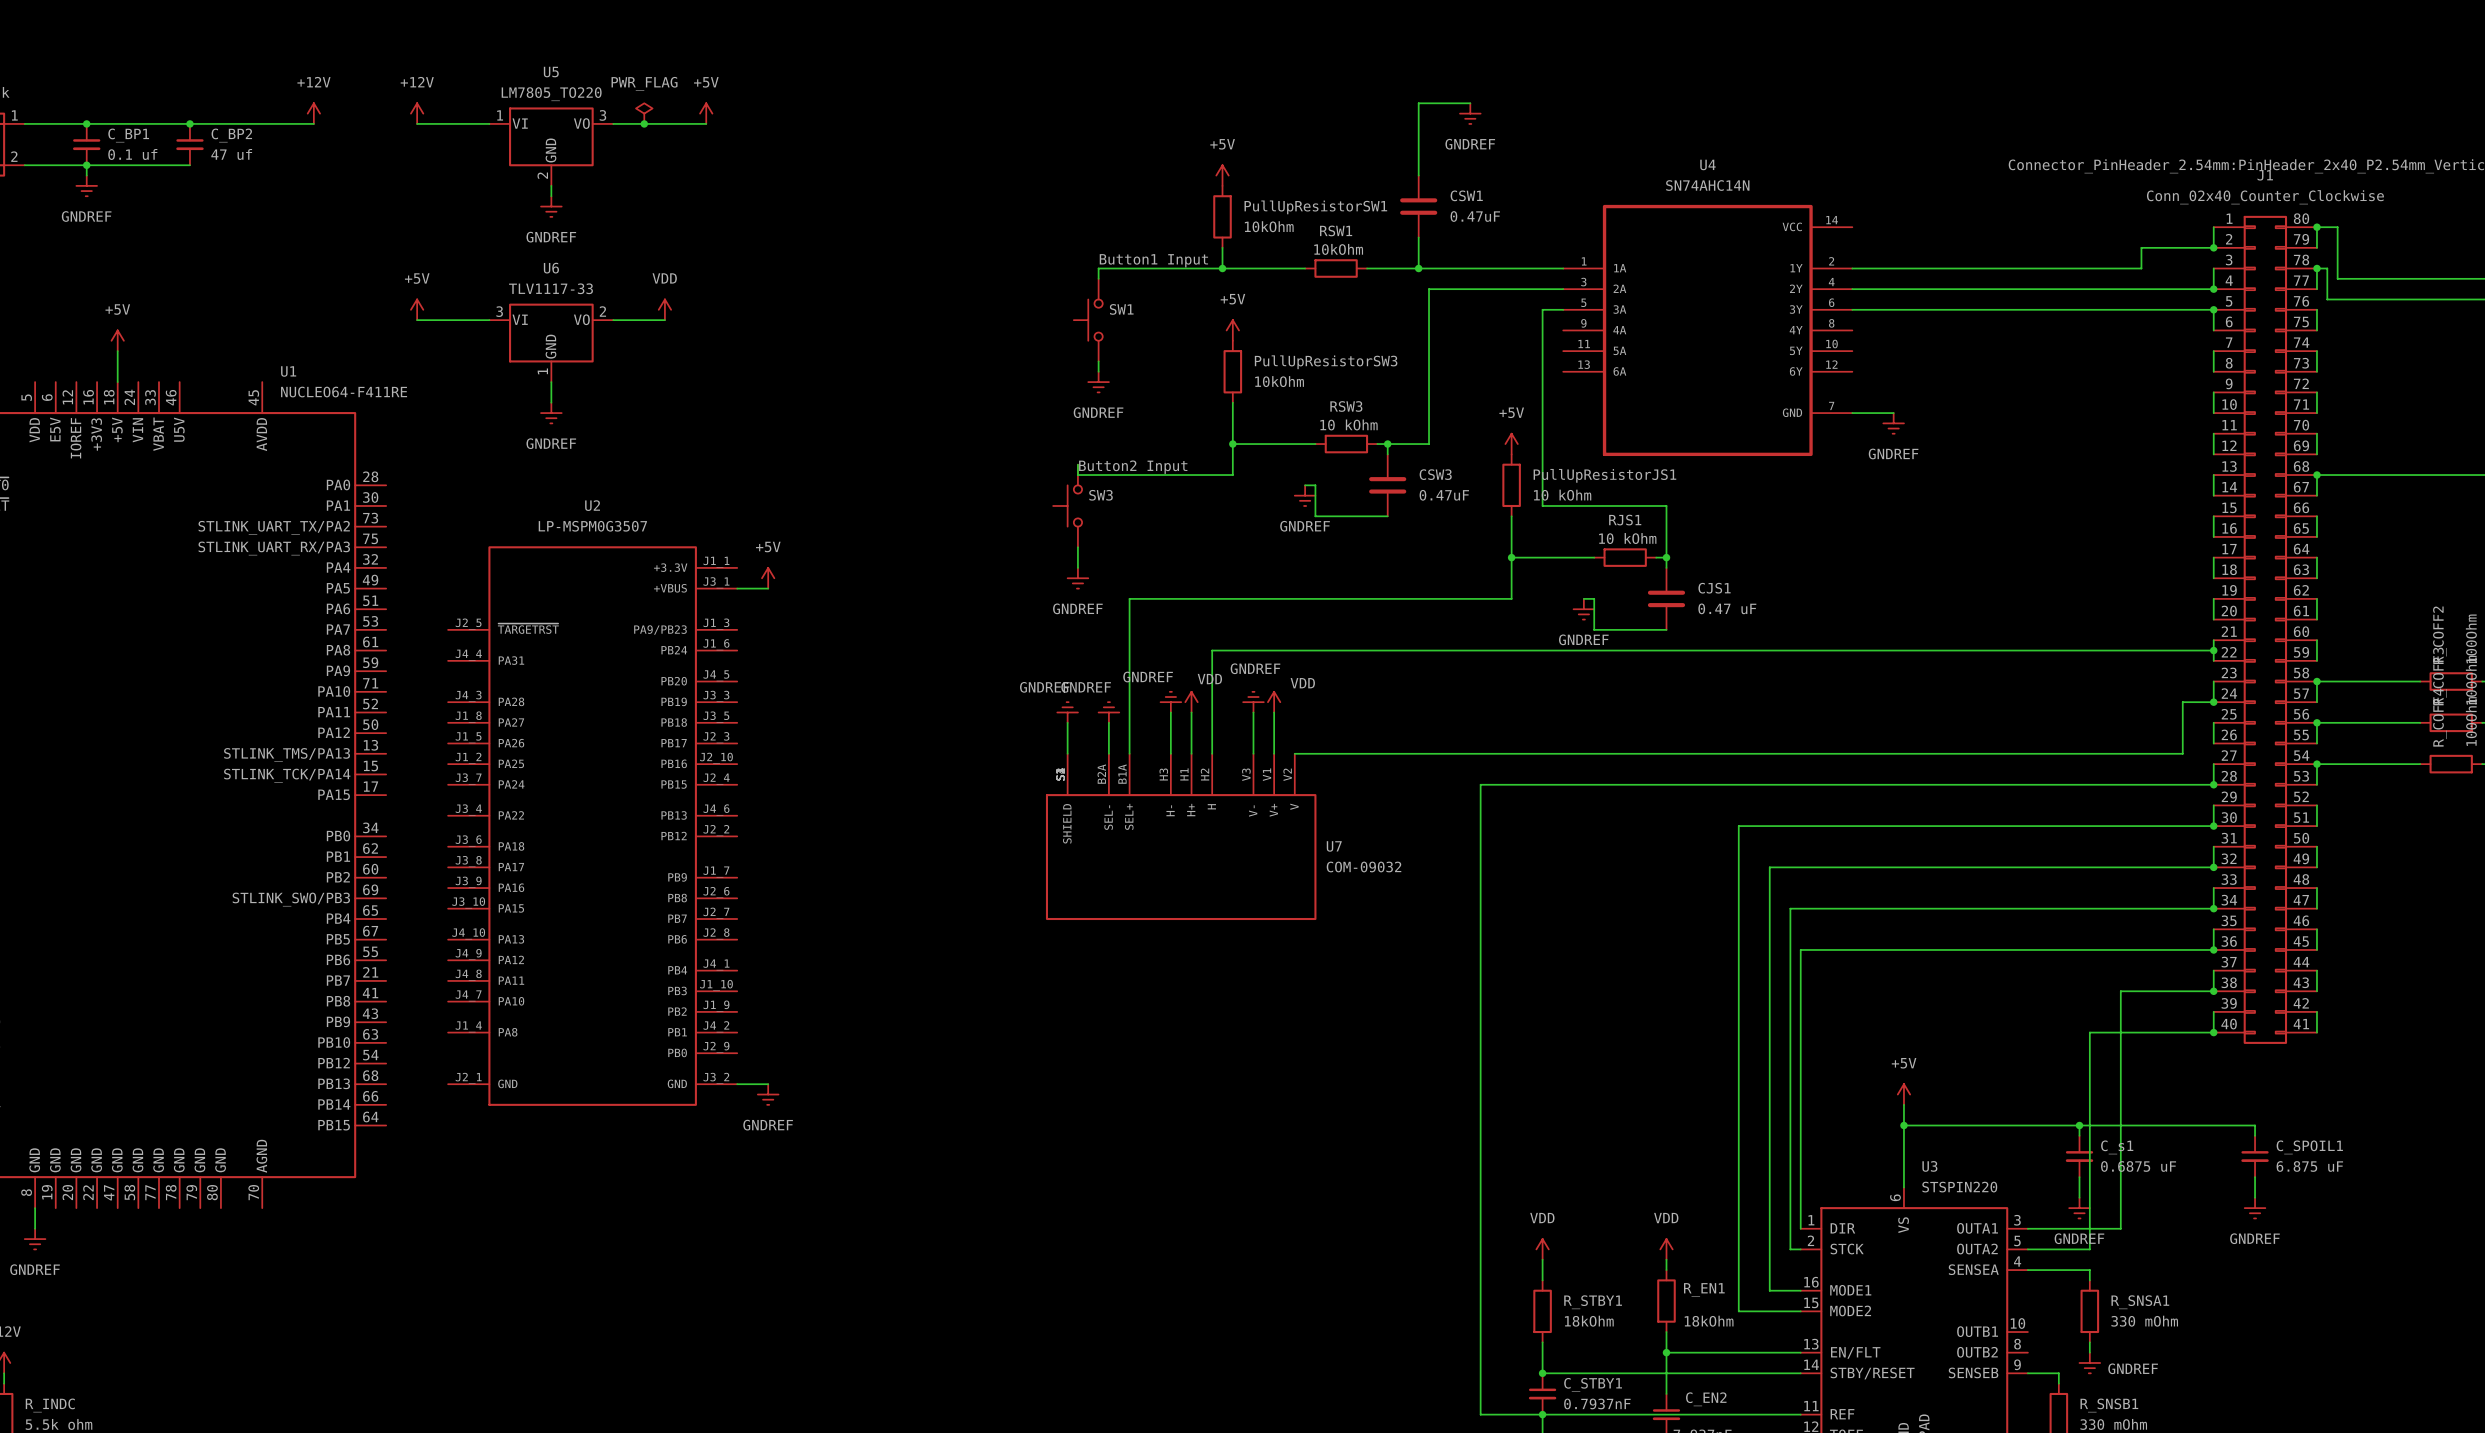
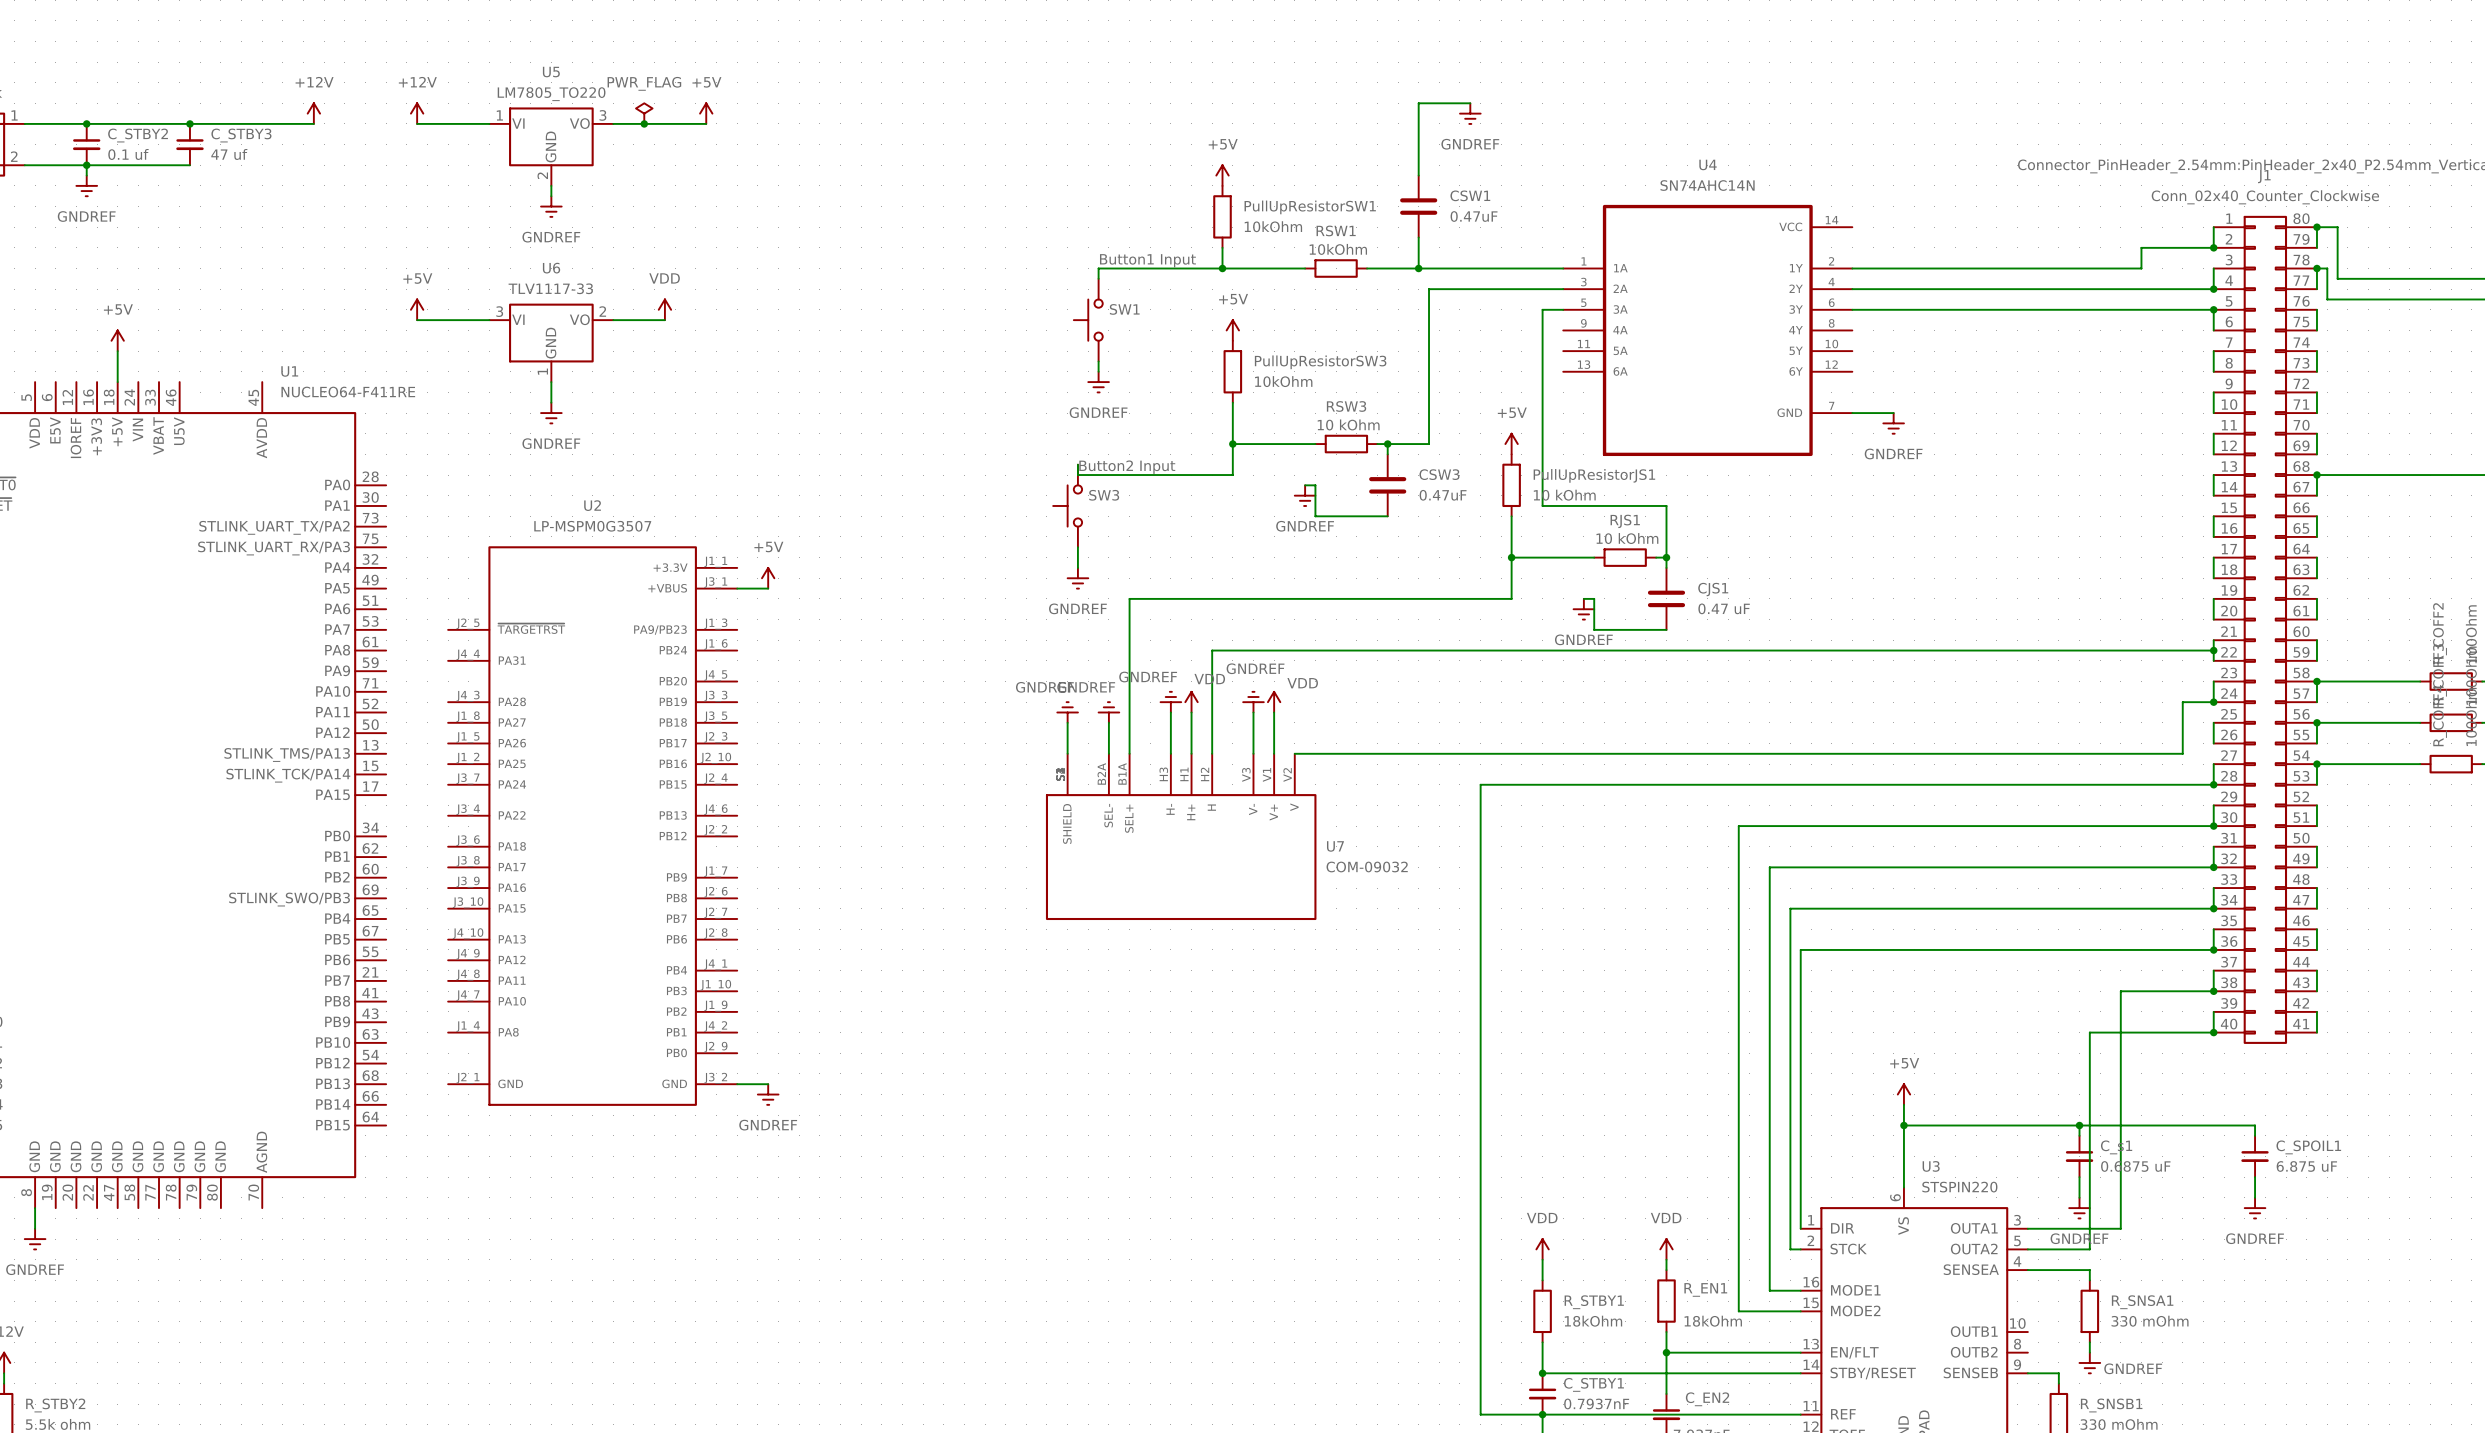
C_BP1 name: C_BP1 (128, 135) -> C_STBY2 (138, 135)
C_BP2 name: C_BP2 (231, 135) -> C_STBY3 (241, 135)
R_INDC name: R_INDC (50, 1405) -> R_STBY2 (55, 1405)

